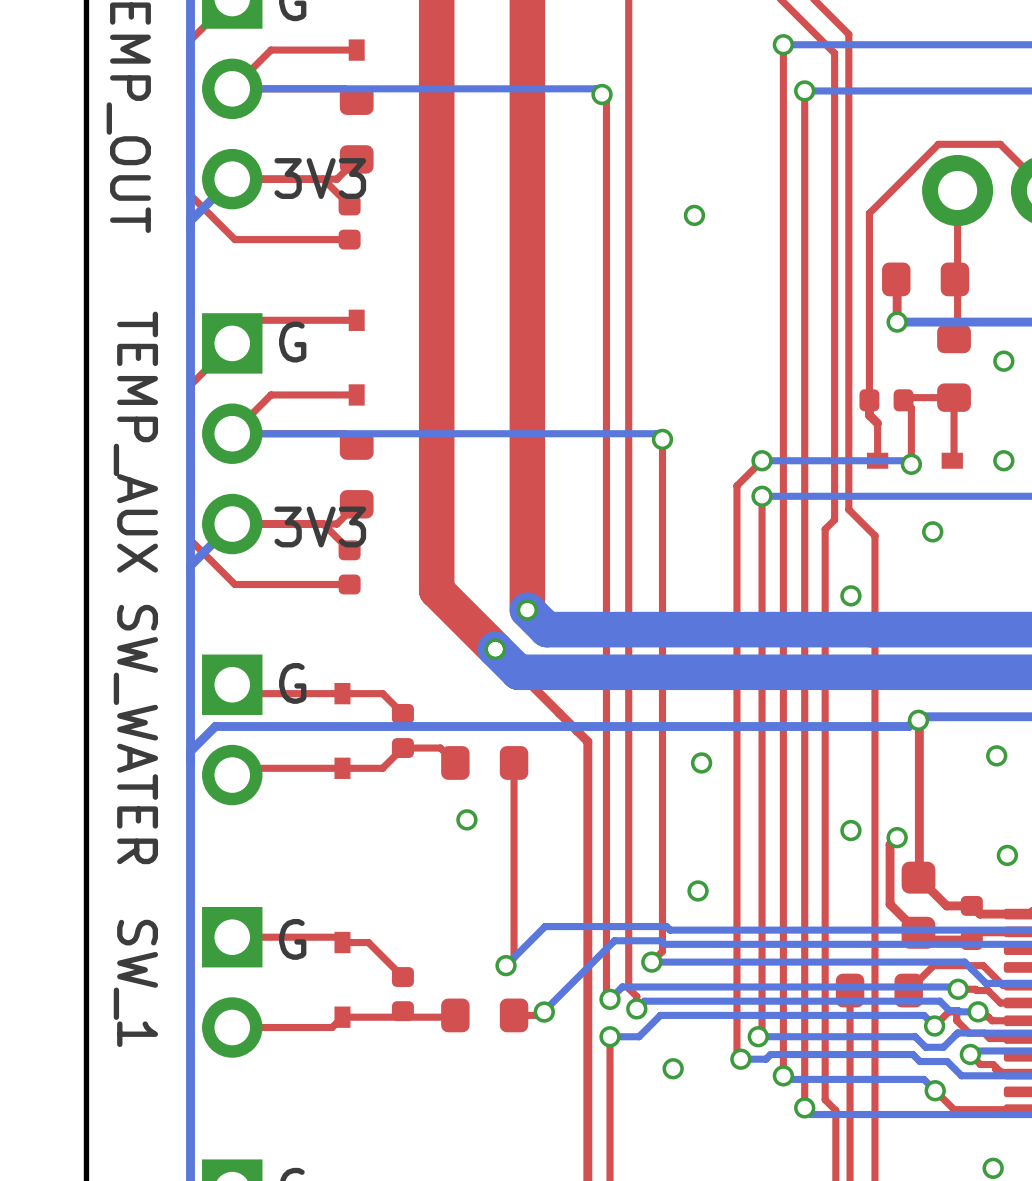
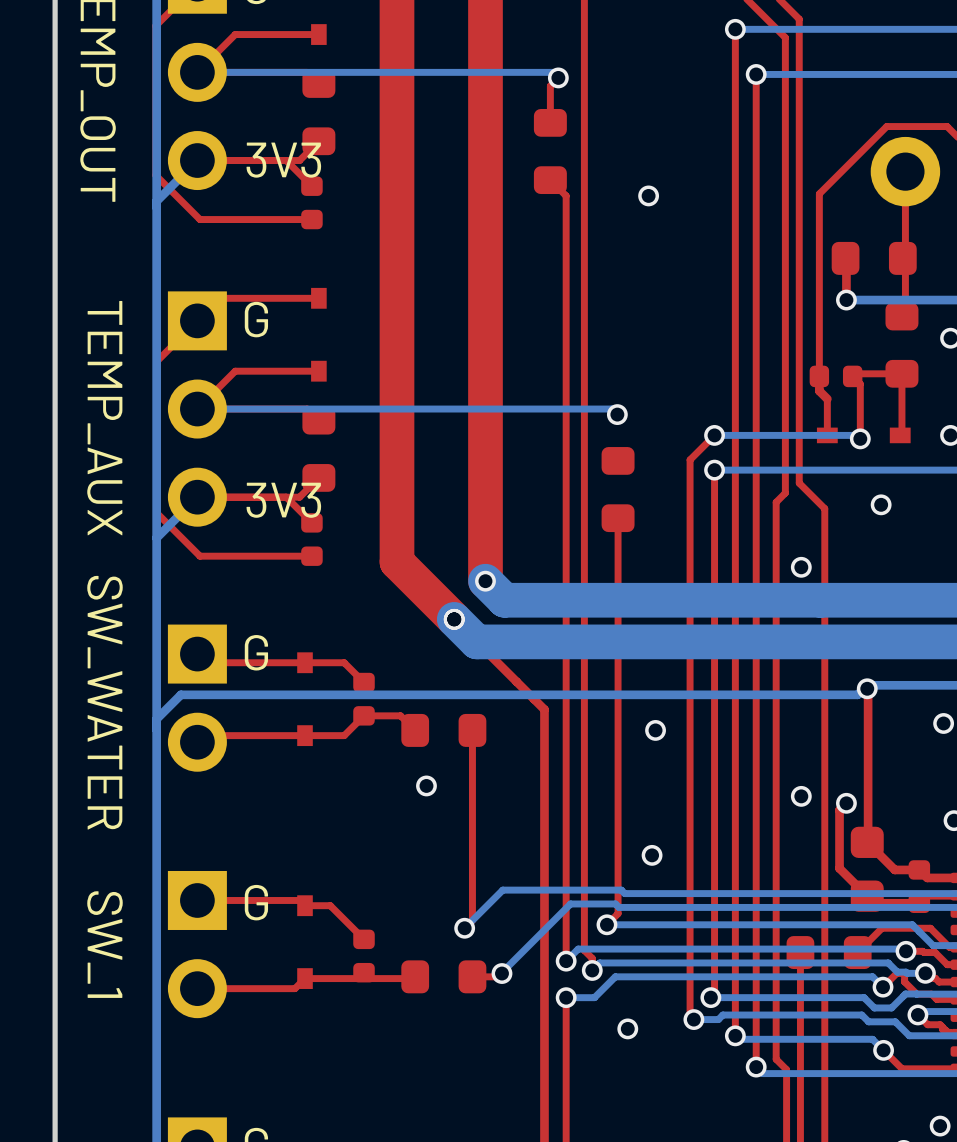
top track: none -> (558, 77) (550, 85) (550, 122)
top track: (606, 98) (606, 995) -> none
part: none -> (550, 151)
top track: none -> (550, 180) (566, 195) (566, 961)
top track: (662, 439) (662, 951) -> (618, 518) (617, 914)
part: none -> (618, 489)

